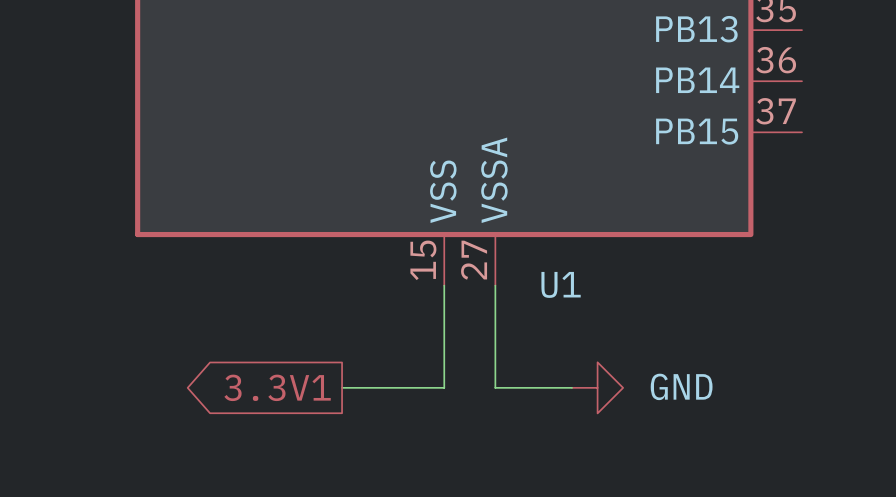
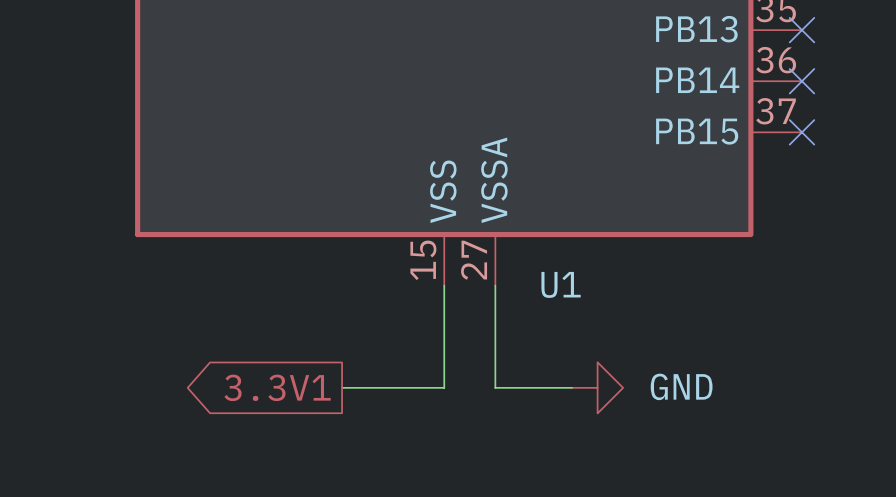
no-connect mark: none -> (801, 30)
no-connect mark: none -> (801, 81)
no-connect mark: none -> (801, 132)

